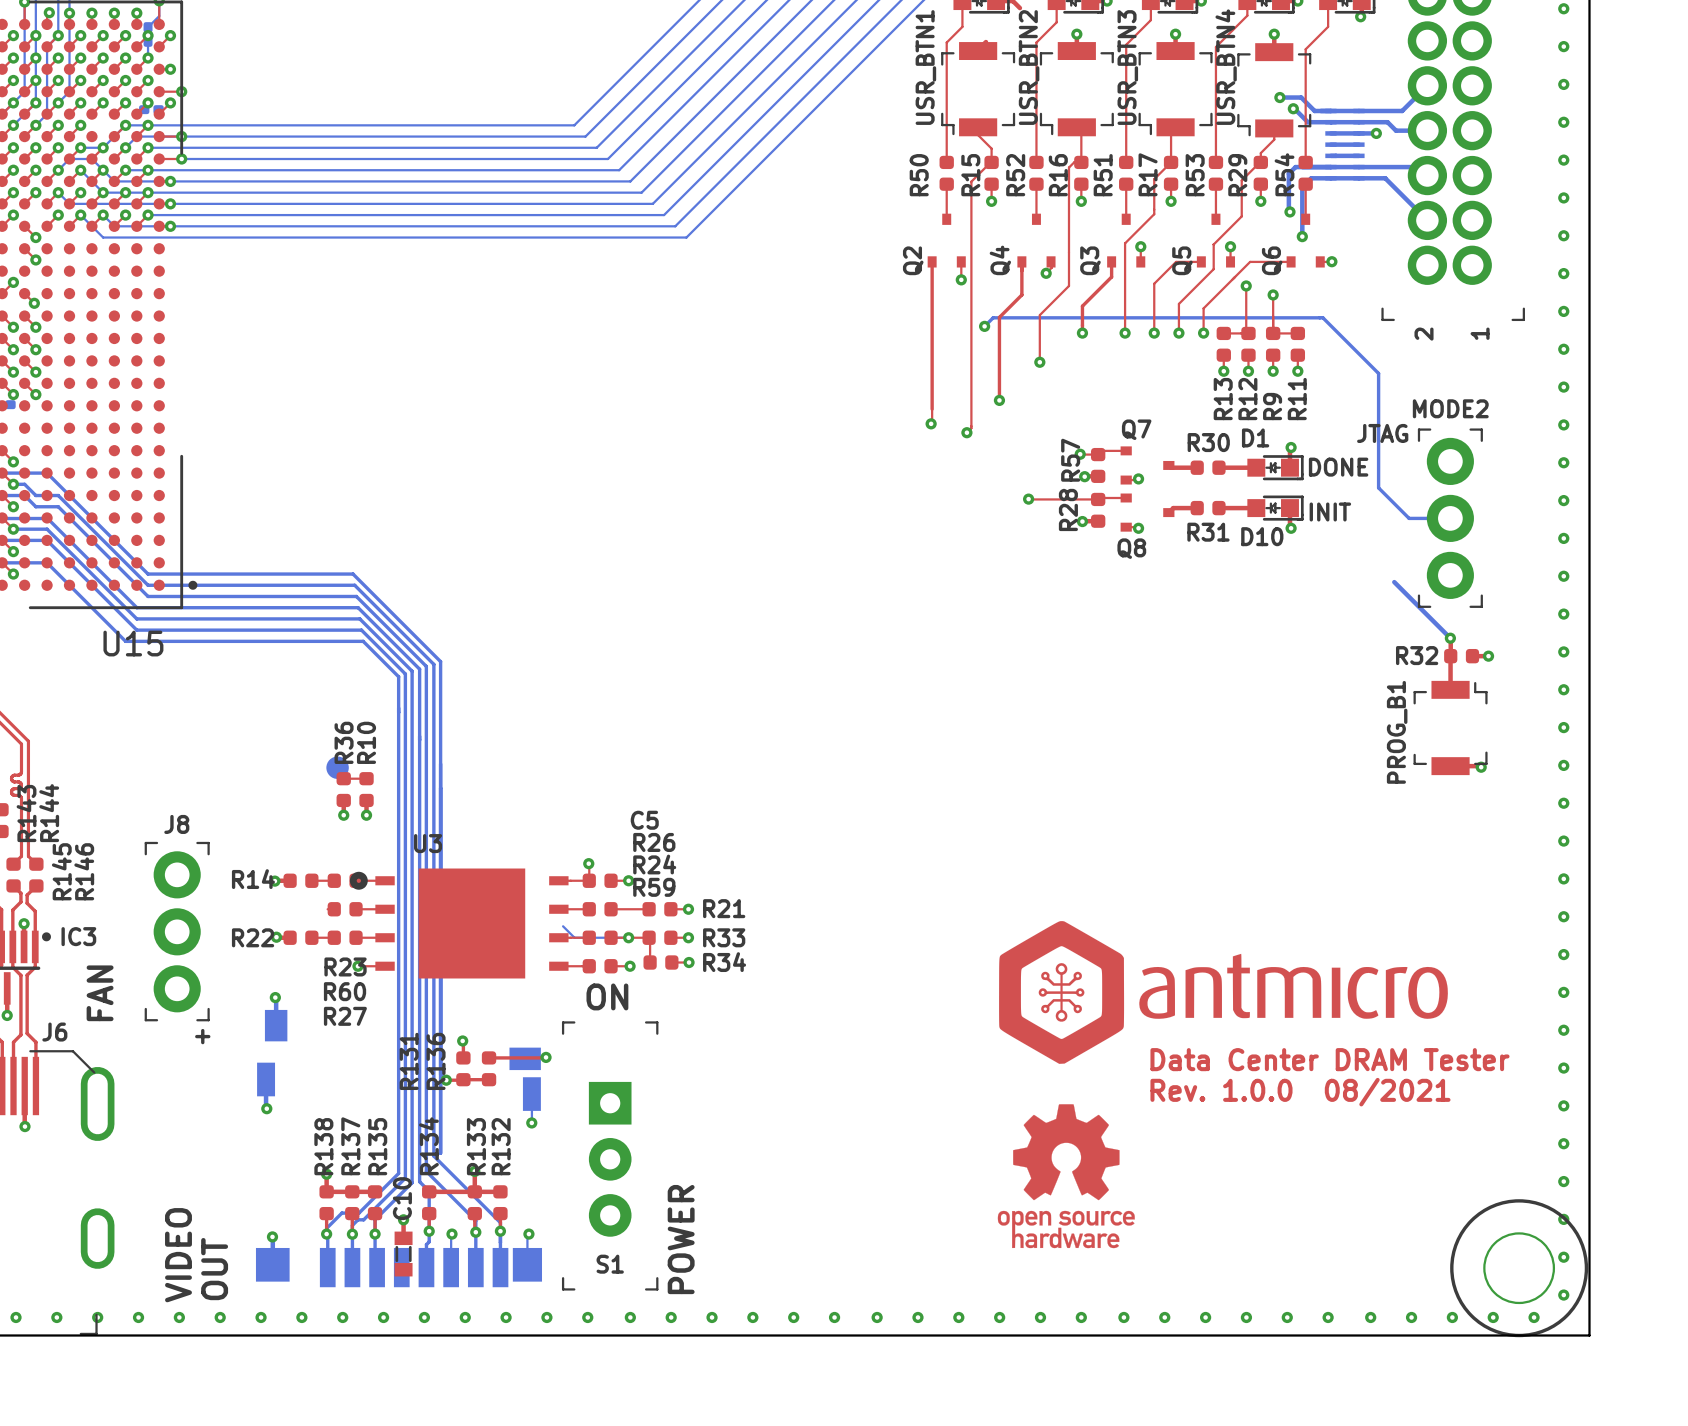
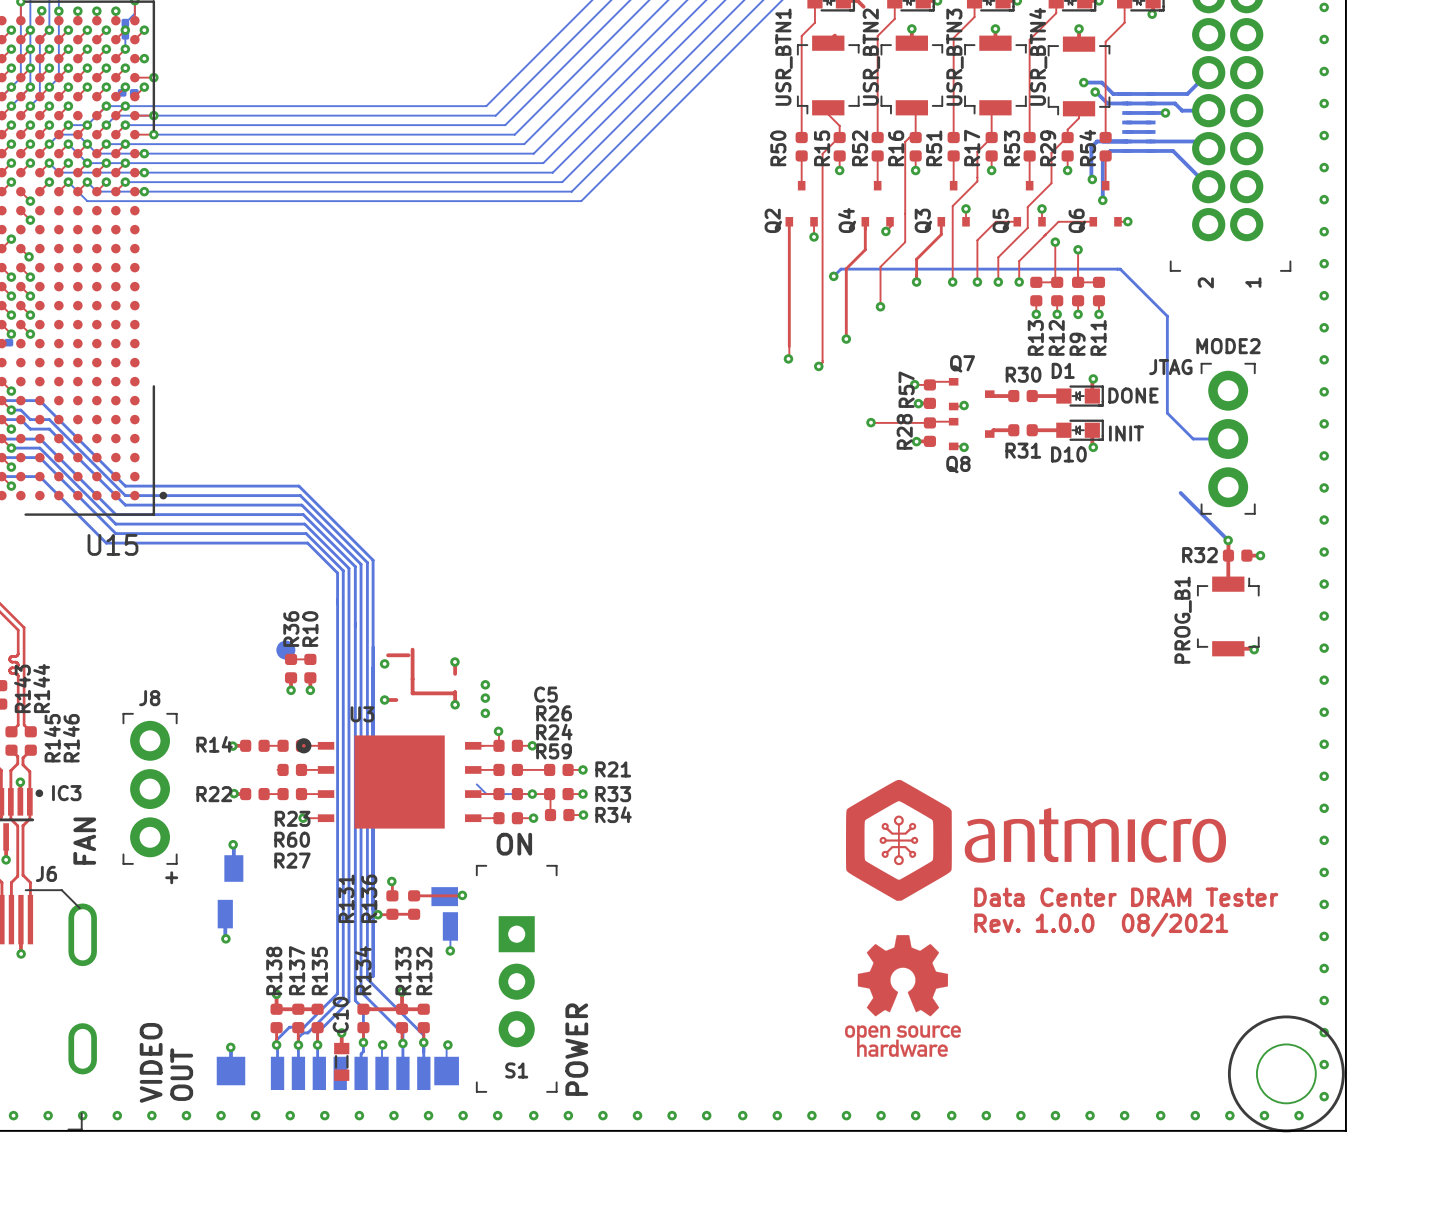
top track: none -> (412, 649) (412, 693) (455, 692) (455, 704)
top track: none -> (388, 655) (408, 655)
top track: none -> (455, 662) (455, 673)
via: none -> (454, 662)
via: none -> (384, 663)
via: none -> (485, 684)
via: none -> (485, 698)
top track: none -> (384, 700) (396, 700)
via: none -> (384, 700)
via: none -> (455, 704)
via: none -> (485, 713)

